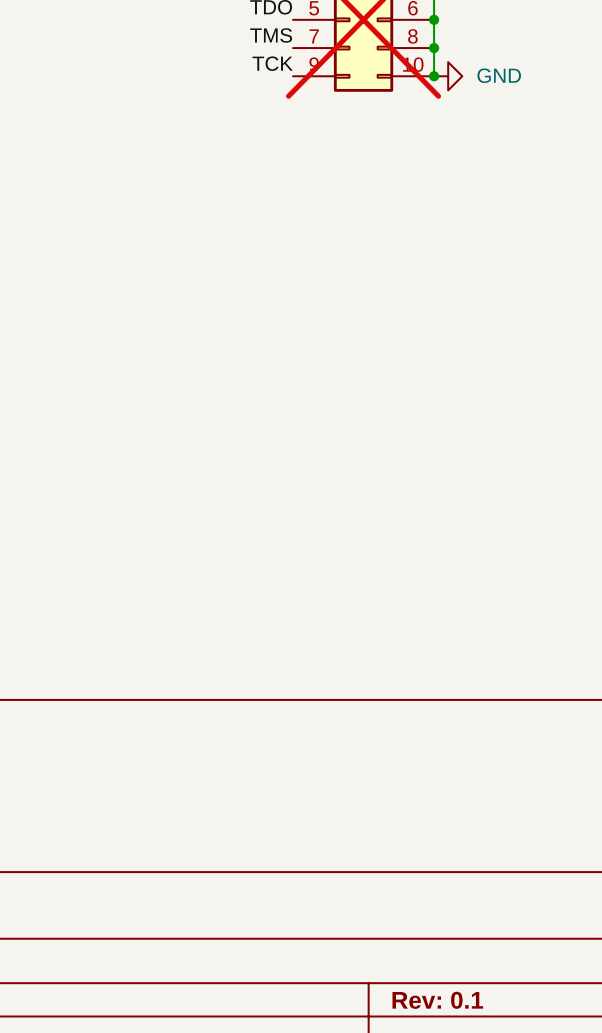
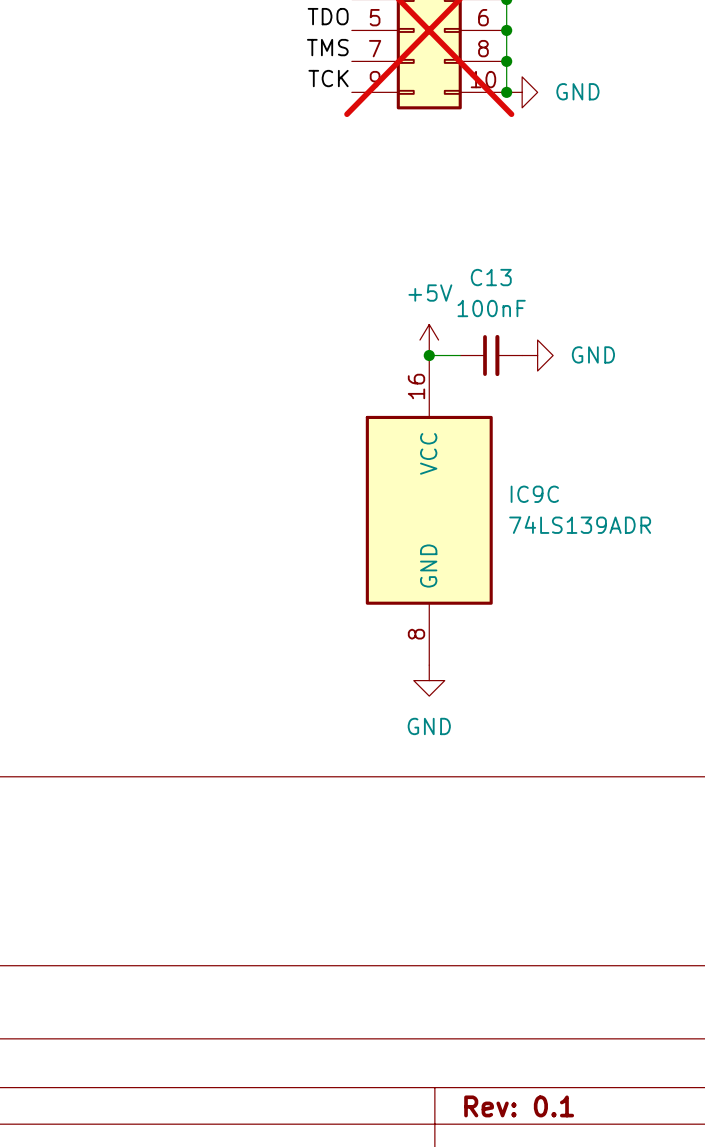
power symbol: none -> +5V (429, 340)
wire: none -> (429, 355) (460, 355)
junction: none -> (429, 355)
C13: none -> 100nF (491, 355)
power symbol: none -> GND (537, 355)
IC9C: none -> 74LS139ADR (429, 510)
power symbol: none -> GND (429, 680)

